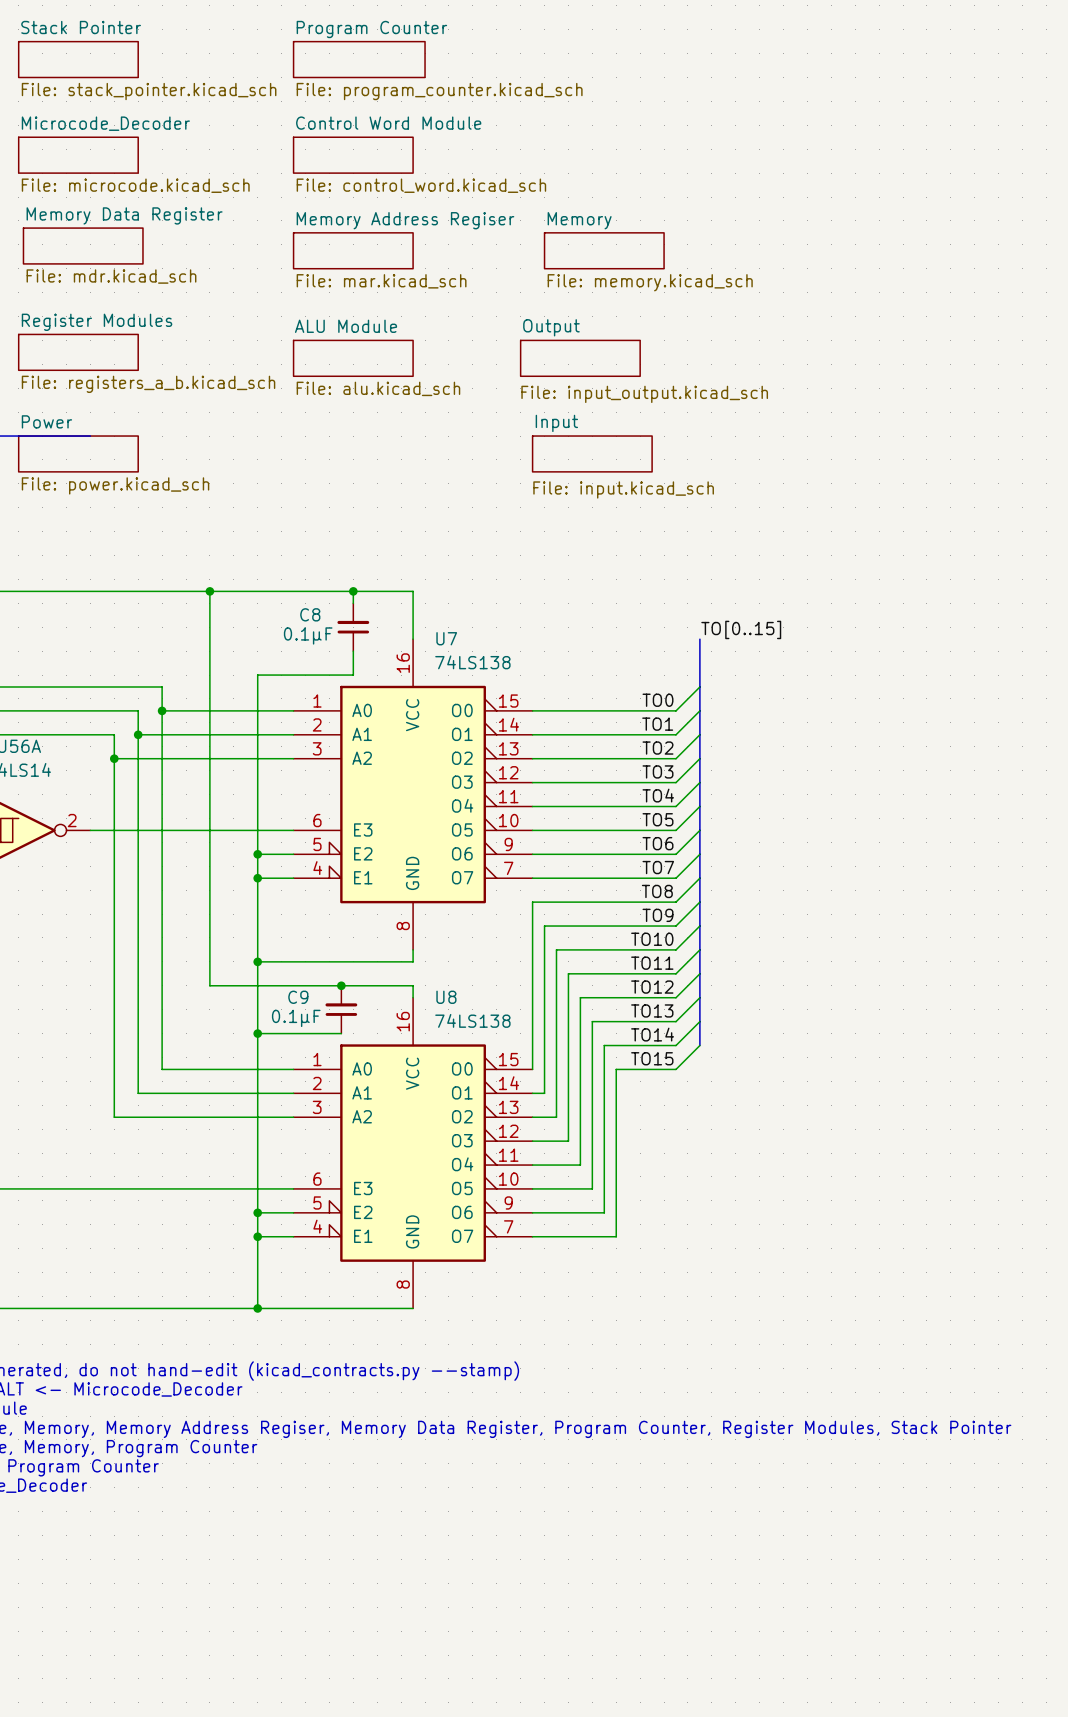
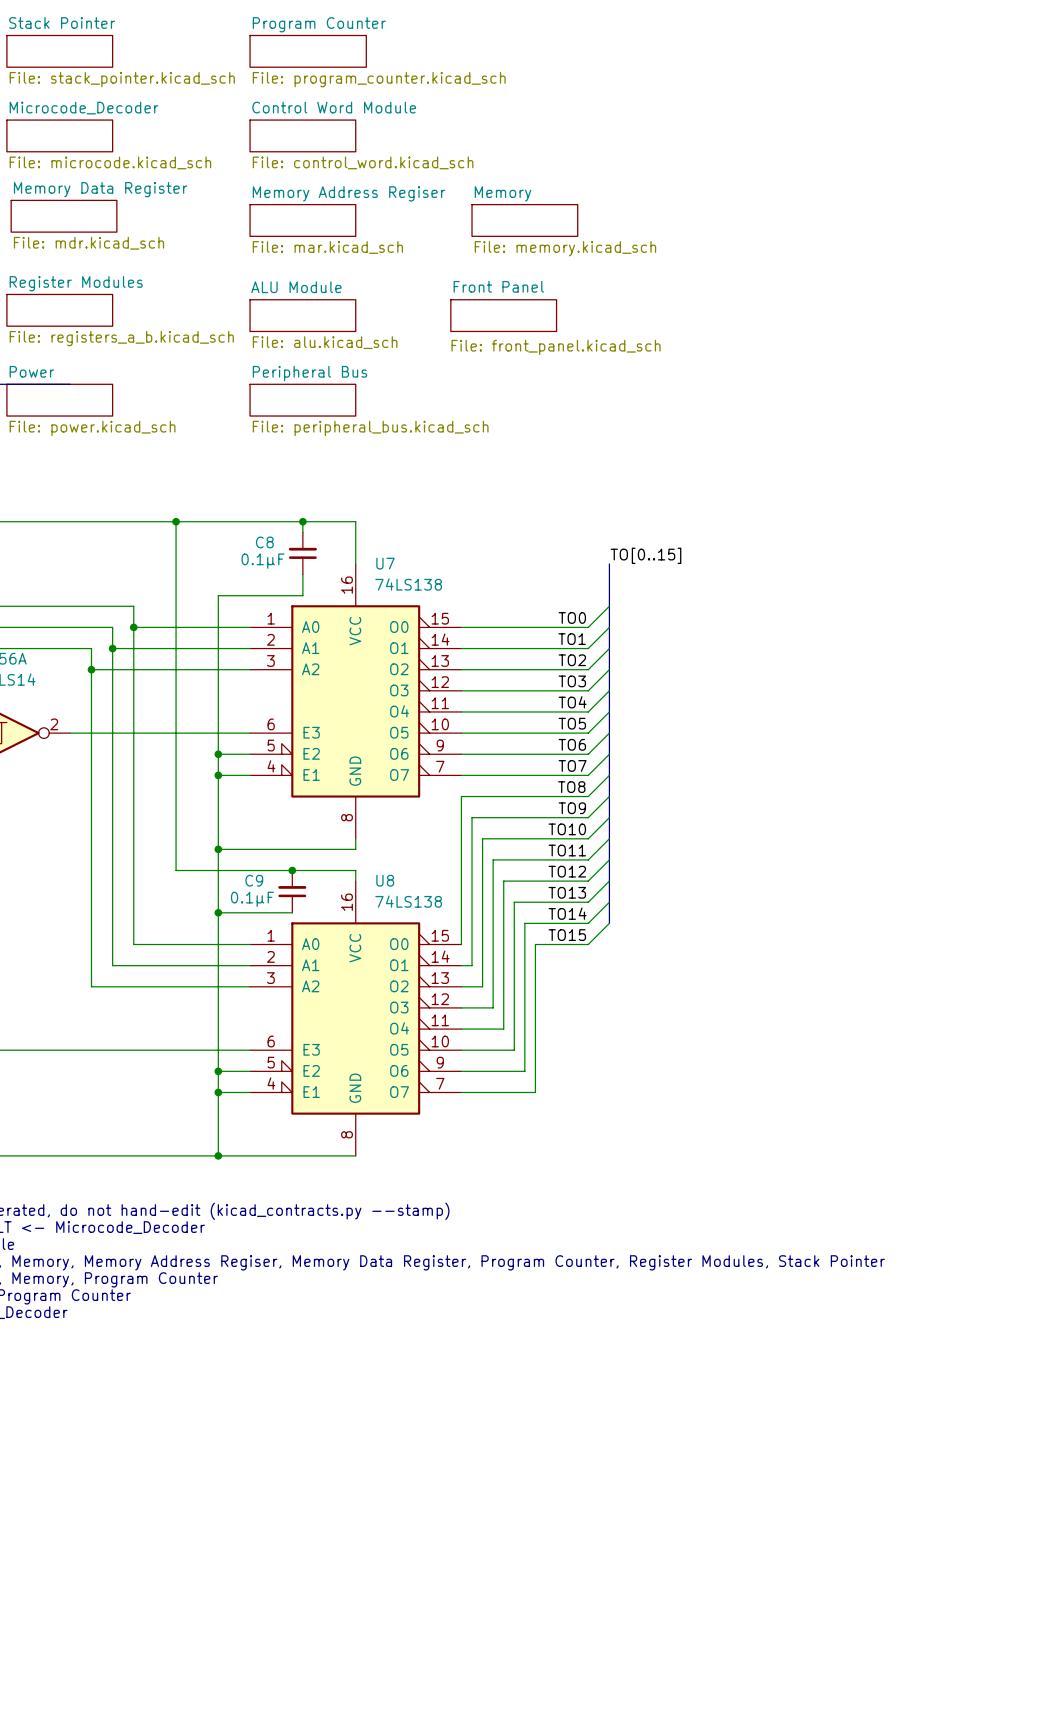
sheet Output name: Output (551, 327) -> Front Panel (498, 286)
sheet Output value: File: input_output.kicad_sch (644, 394) -> File: front_panel.kicad_sch (556, 347)
sheet Peripheral Bus: none -> File: peripheral_bus.kicad_sch (302, 400)
sheet Input: File: input.kicad_sch (592, 453) -> none

